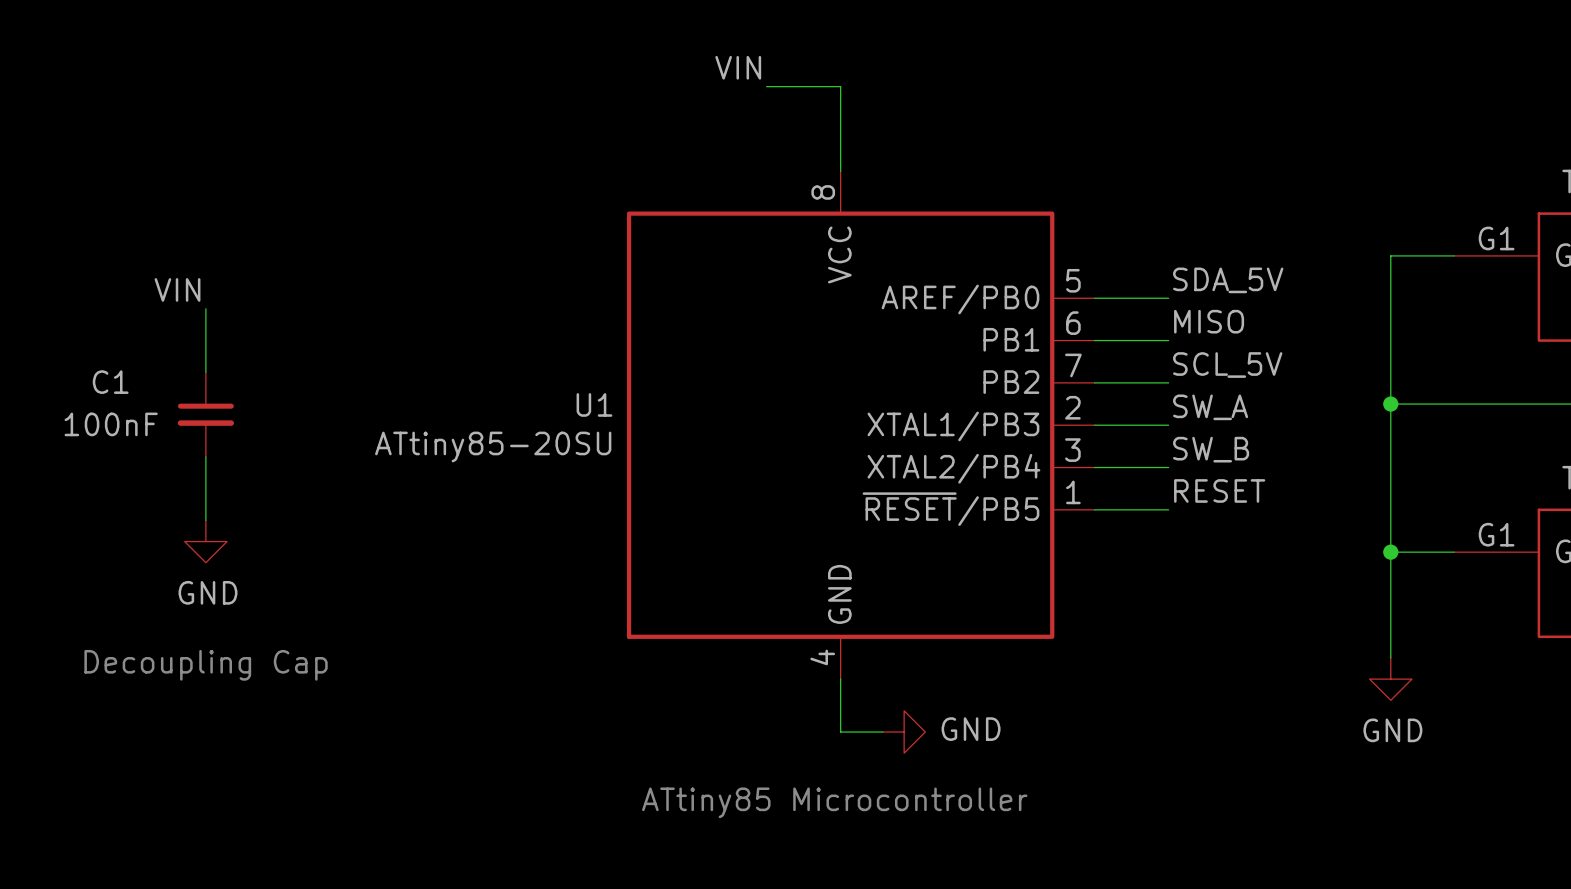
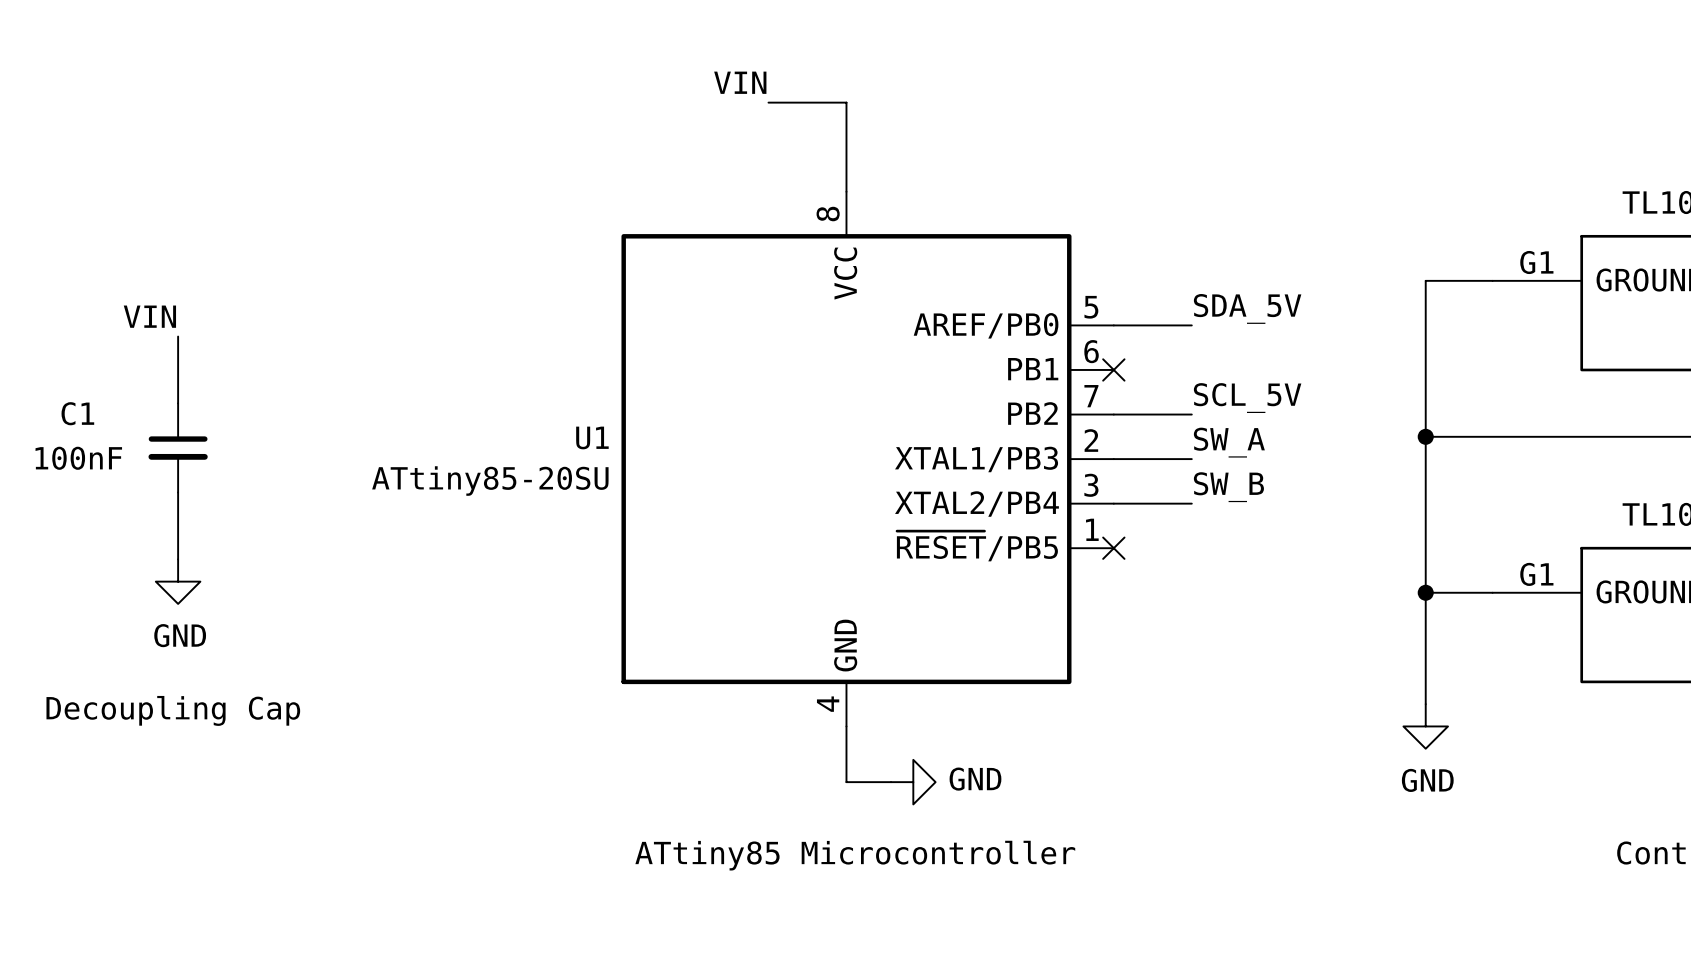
label: MISO (1209, 321) -> none
wire: (1094, 340) (1168, 340) -> none
no-connect mark: none -> (1113, 369)
label: RESET (1219, 490) -> none
wire: (1094, 509) (1168, 509) -> none
no-connect mark: none -> (1113, 548)

